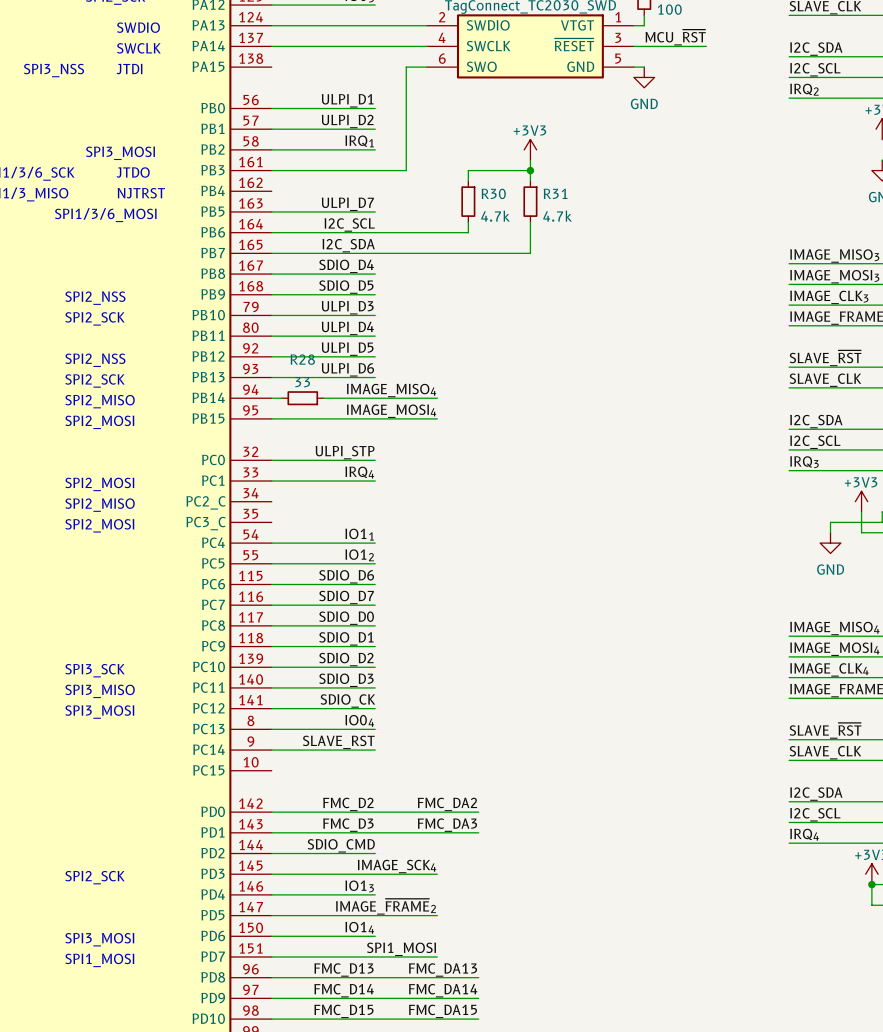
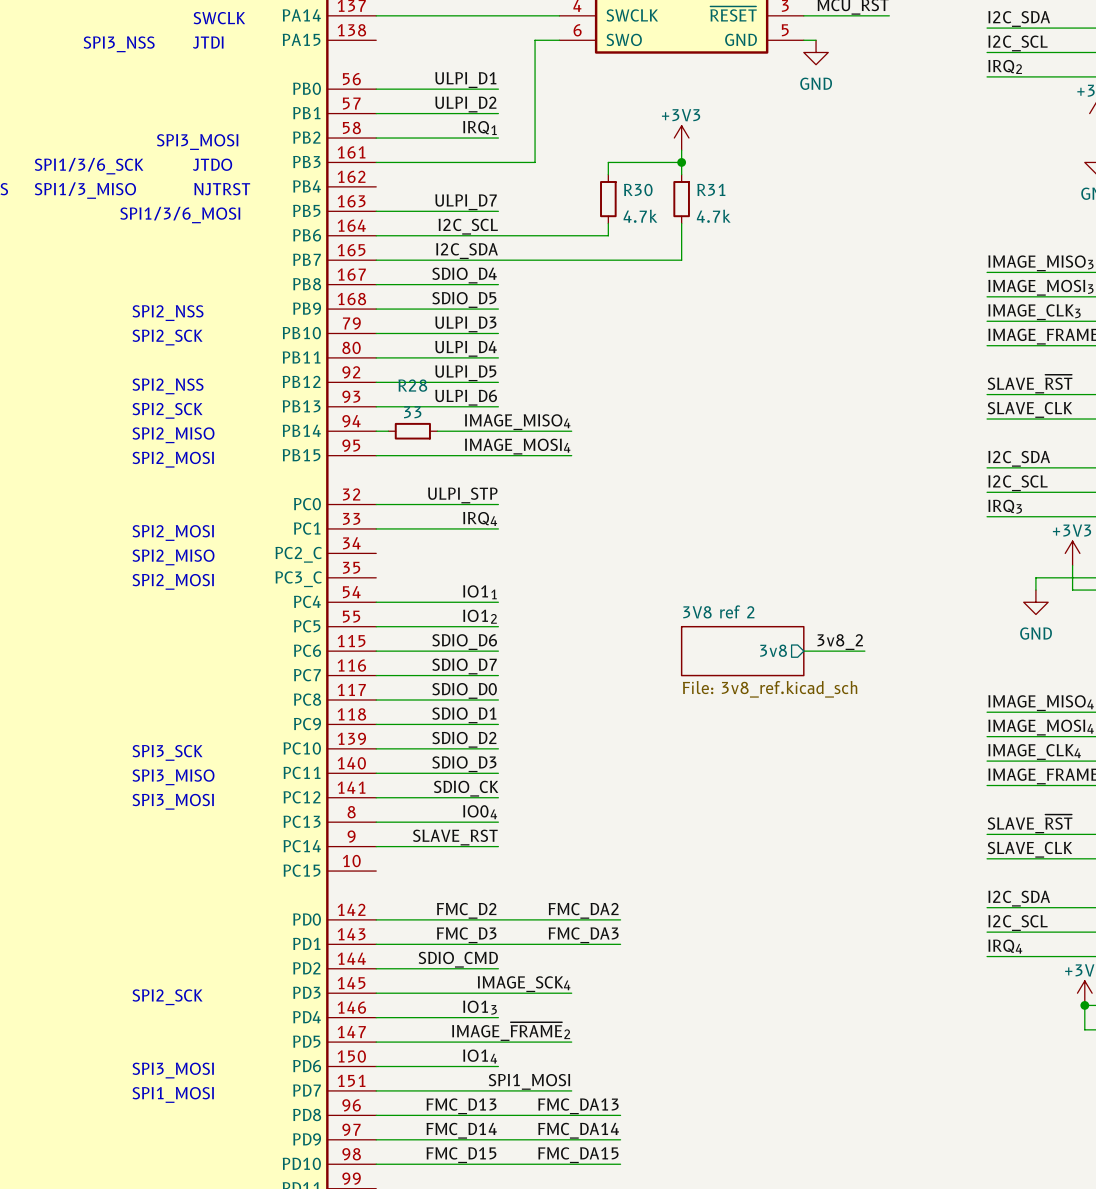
label: none -> 3v8_2 (840, 642)
sheet 3V8 ref 2: none -> File: 3v8_ref.kicad_sch (742, 651)
sheet pin: none -> 3v8 (773, 650)
wire: none -> (803, 651) (864, 651)

